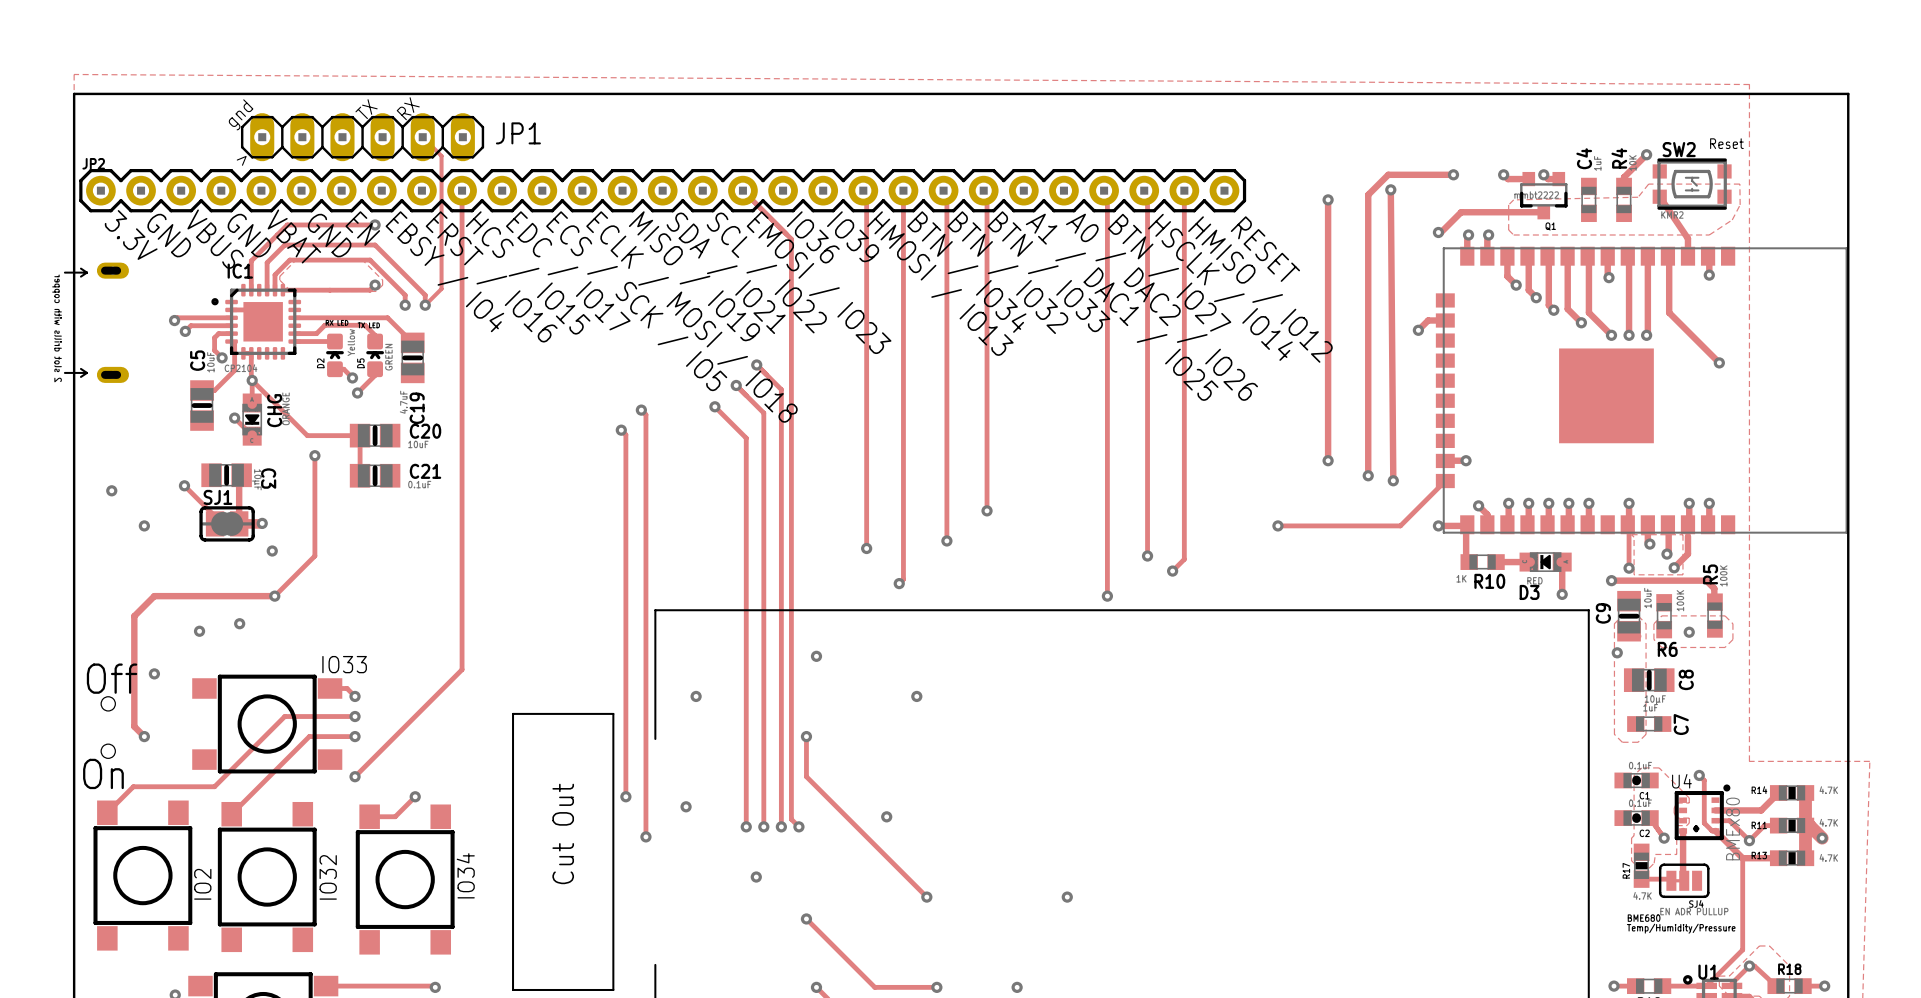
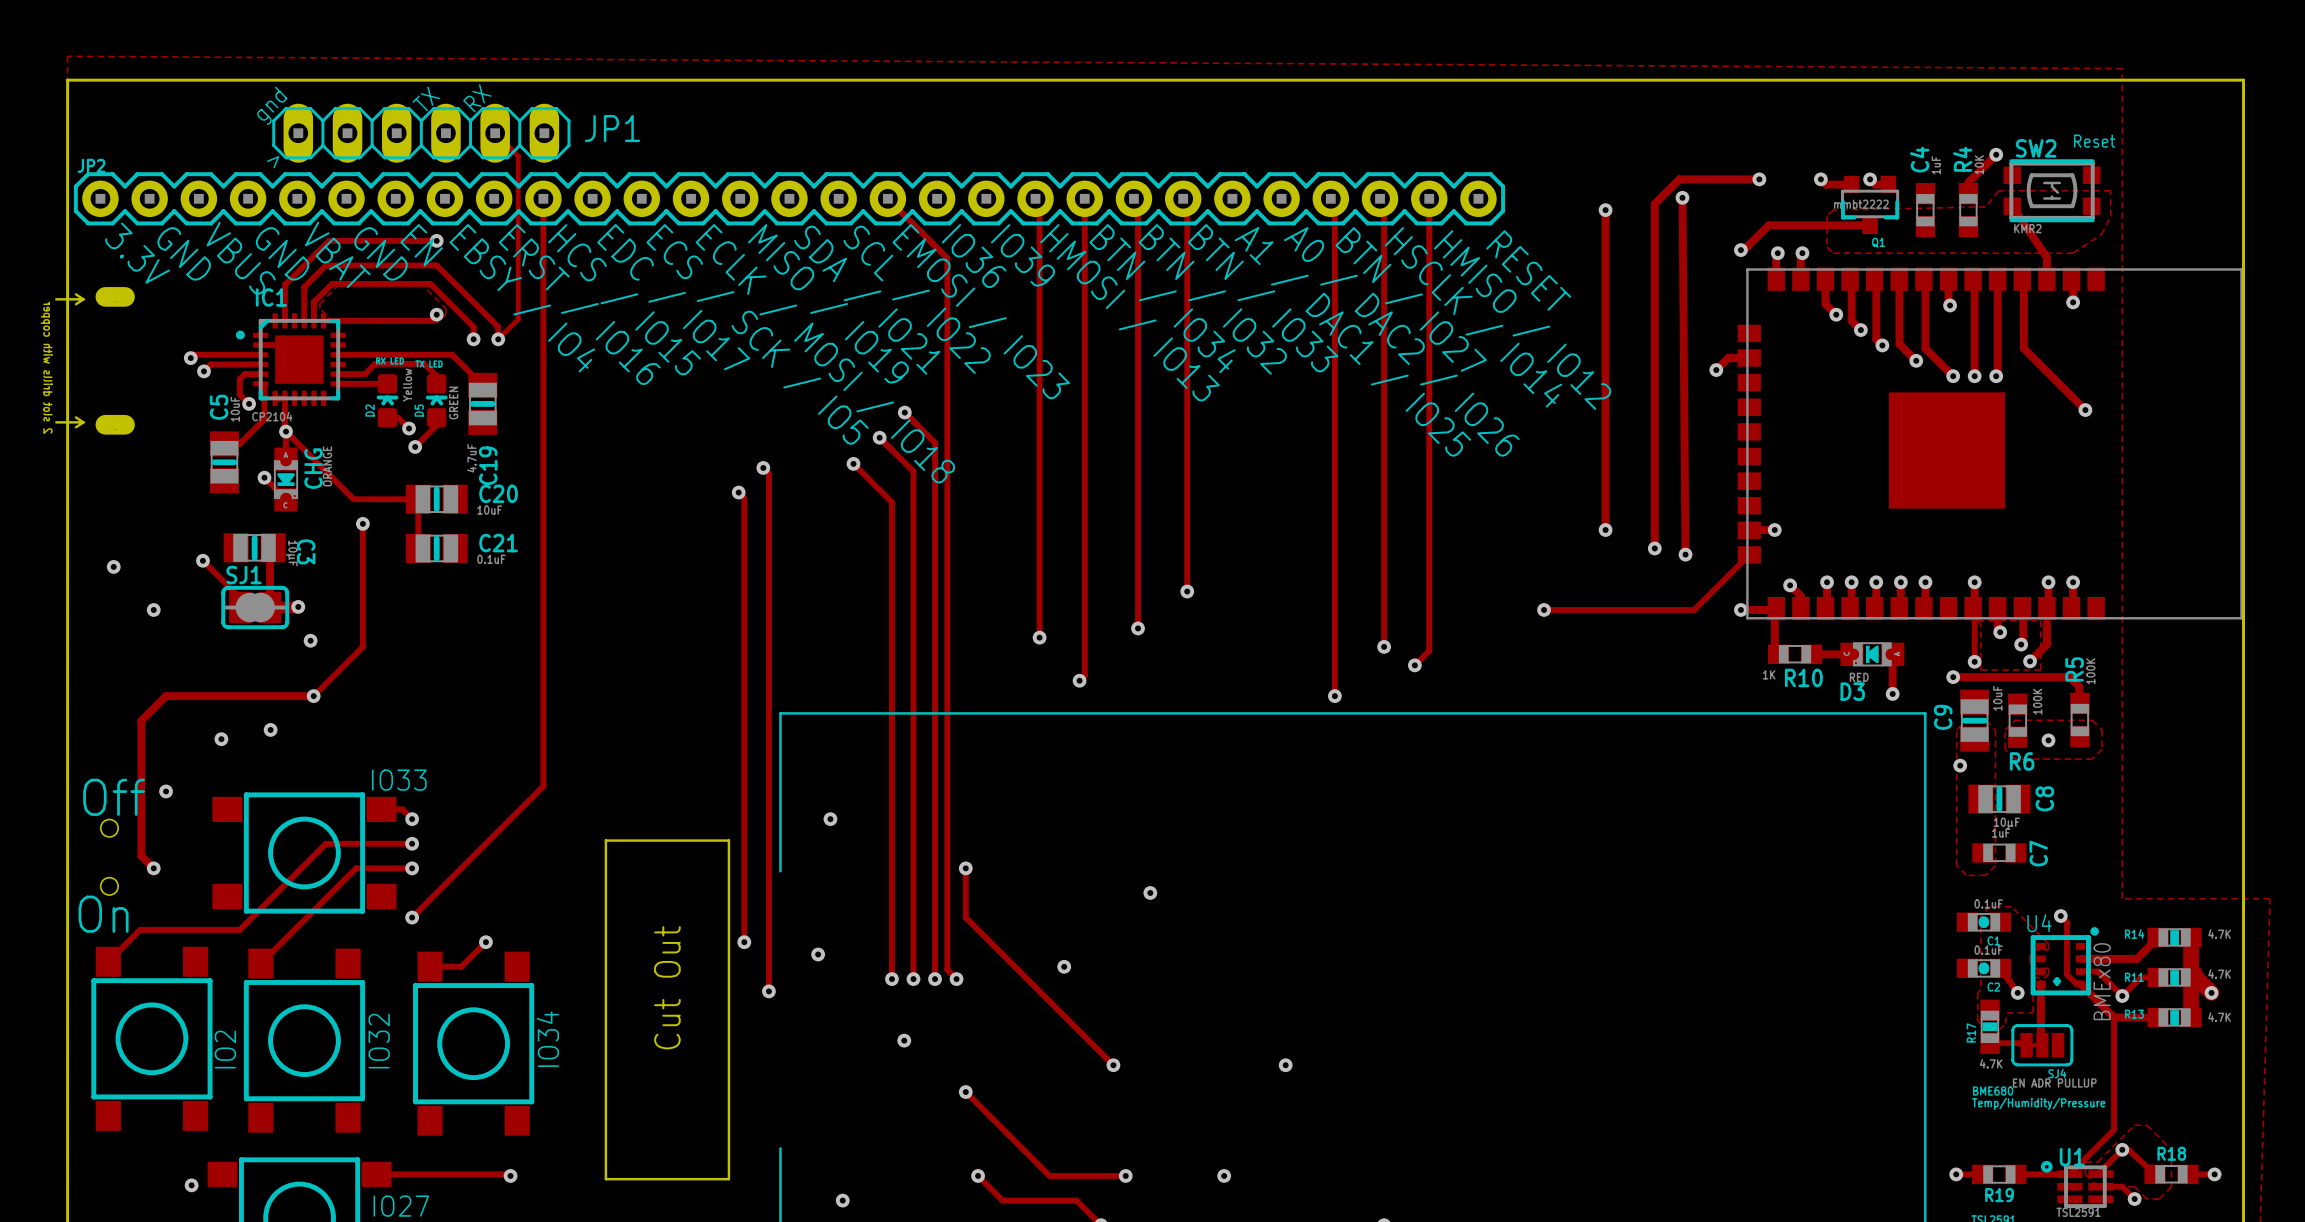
via: (816, 656) -> none
via position: (916, 696) -> (1150, 892)

